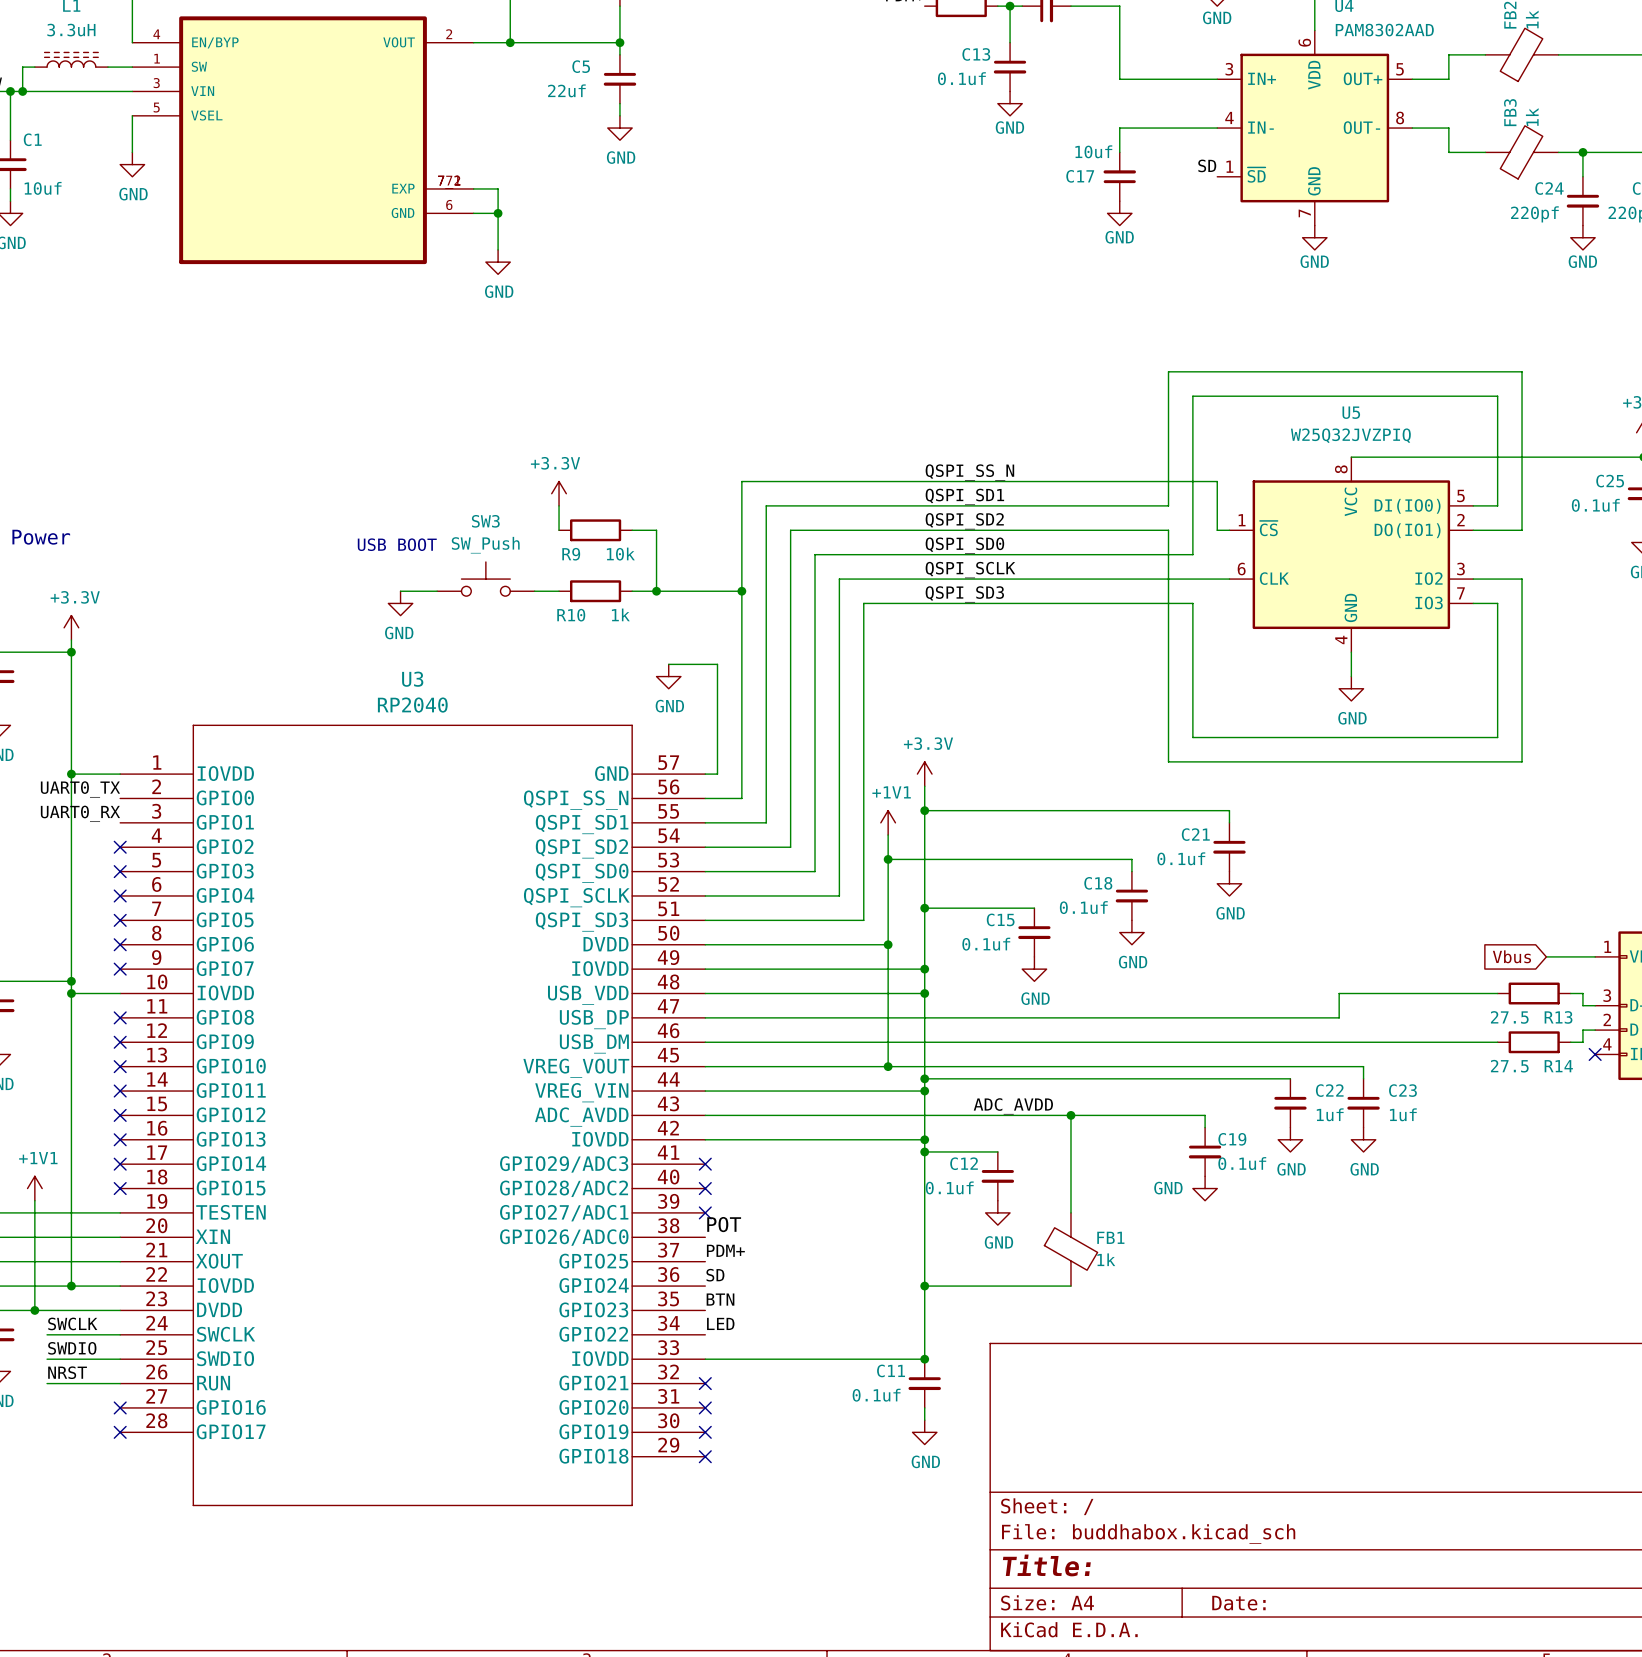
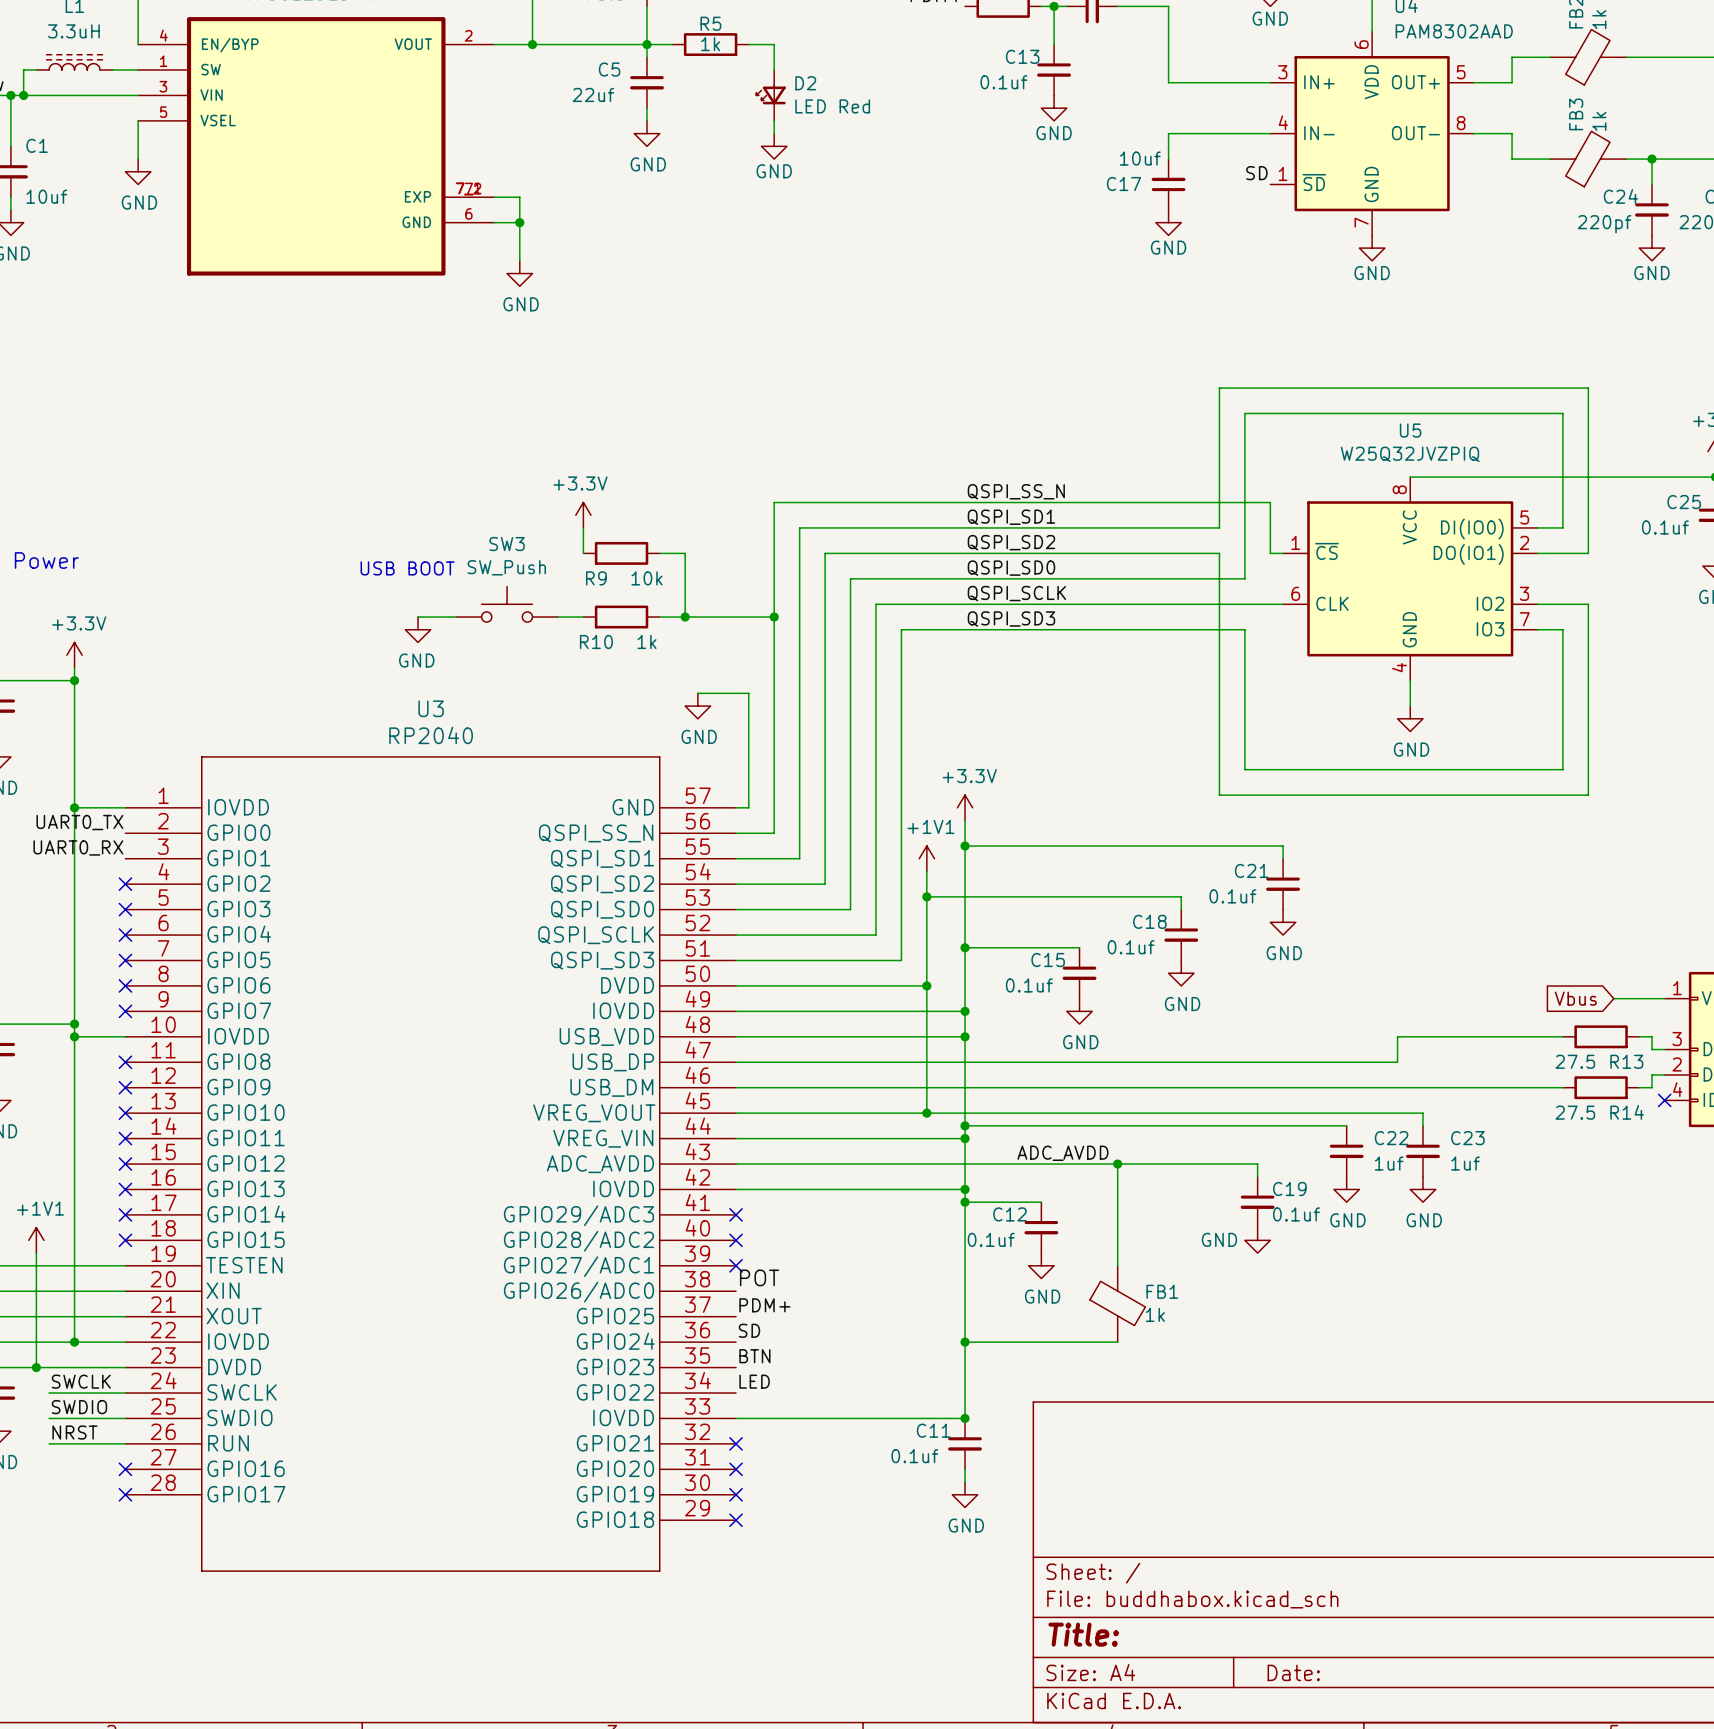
wire: none -> (646, 44) (672, 44)
R5: none -> 1k (710, 44)
wire: none -> (748, 44) (774, 44) (774, 70)
D2: none -> LED Red (771, 95)
wire: none -> (774, 120) (774, 133)
power symbol: none -> GND (774, 146)

